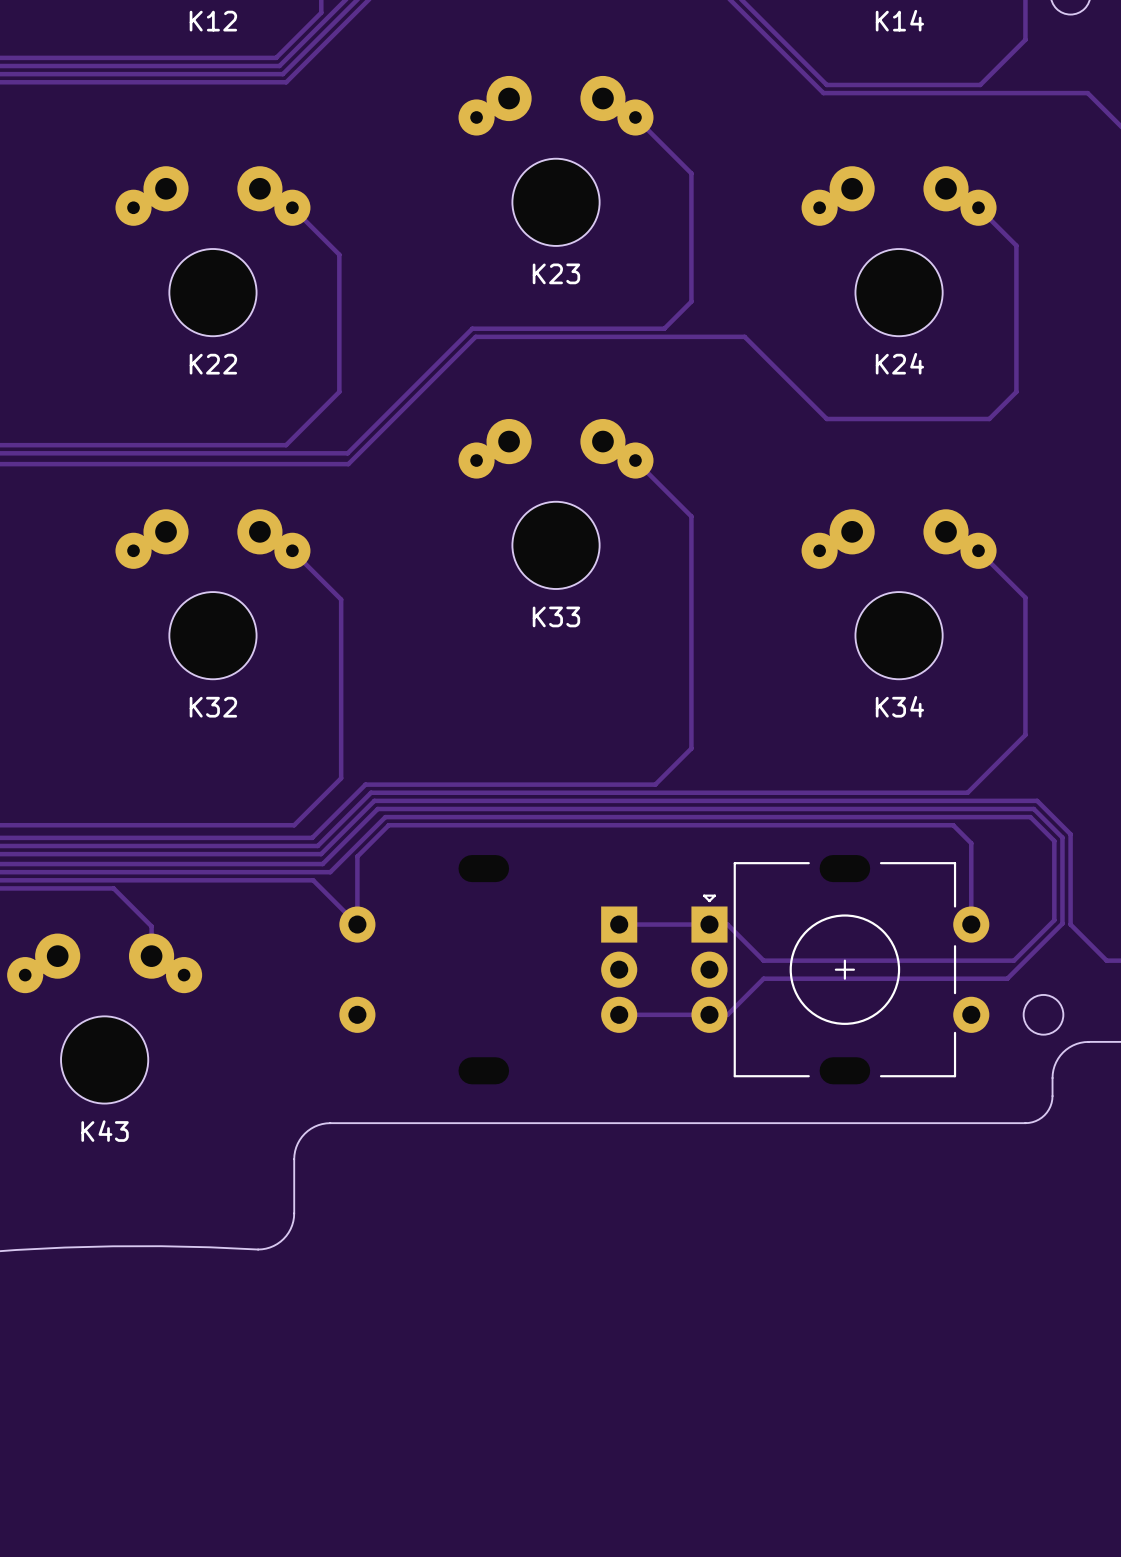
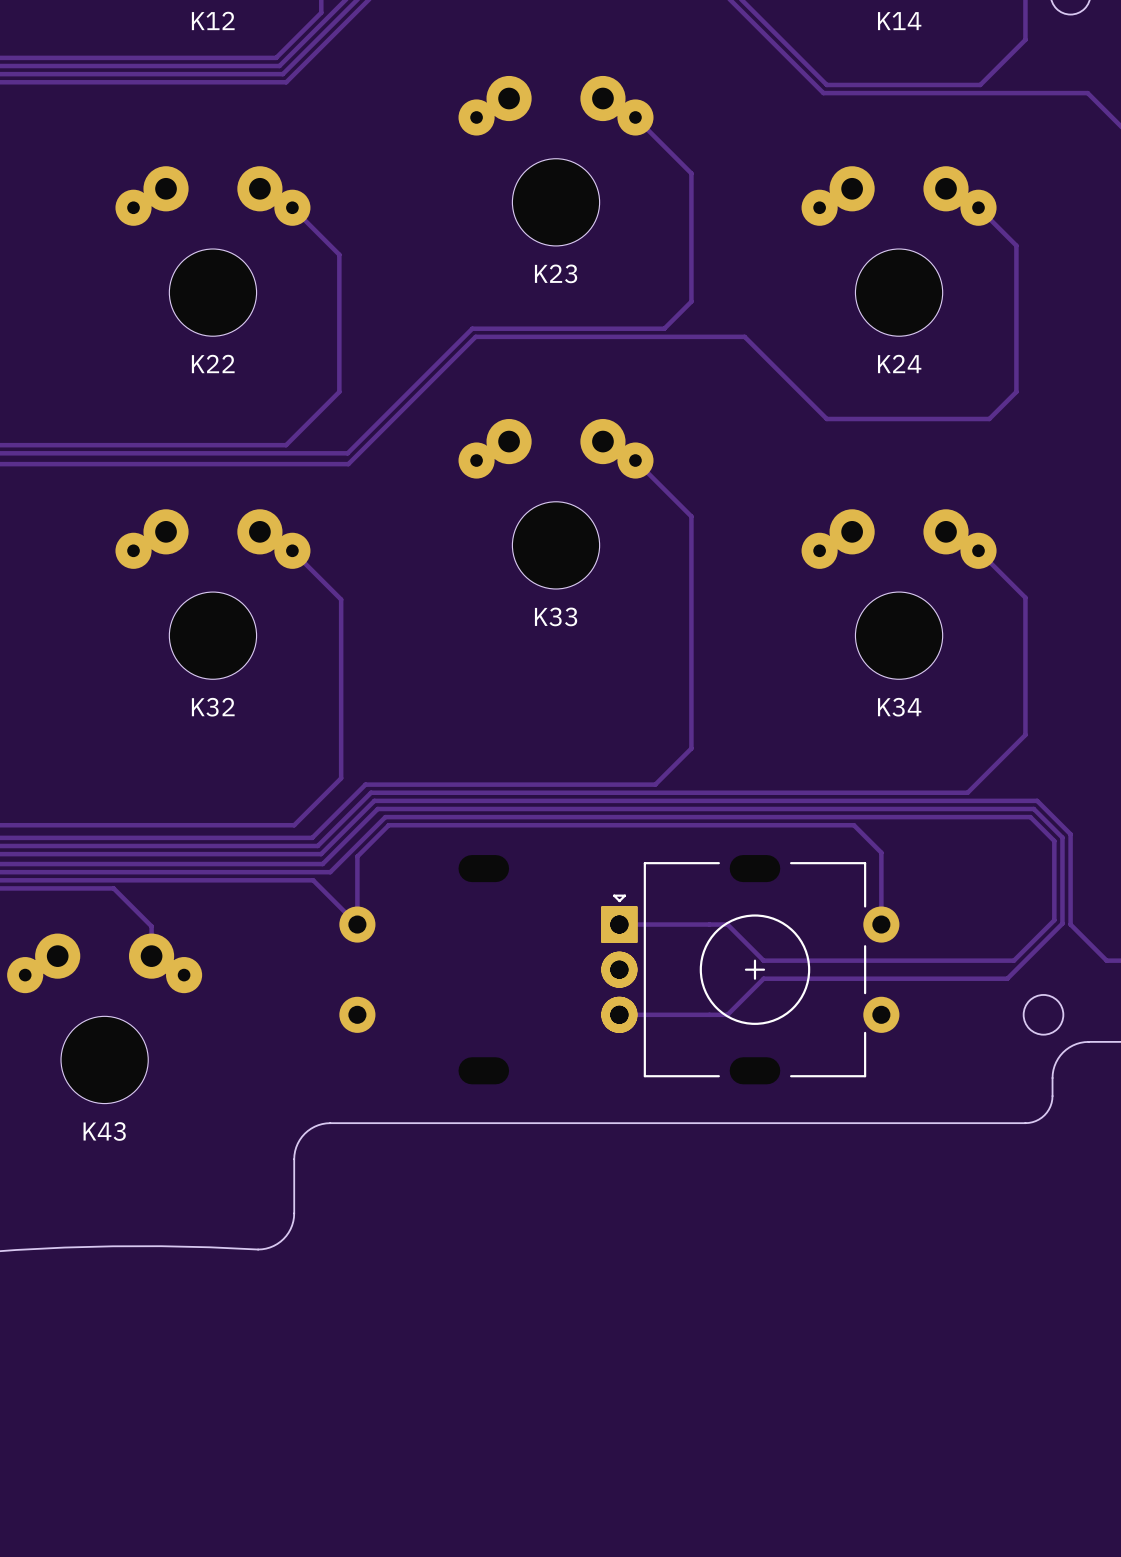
track: (853, 825) (953, 825) (971, 843) (971, 924) -> (853, 825) (881, 852) (881, 924)
part position: (840, 969) -> (750, 969)

